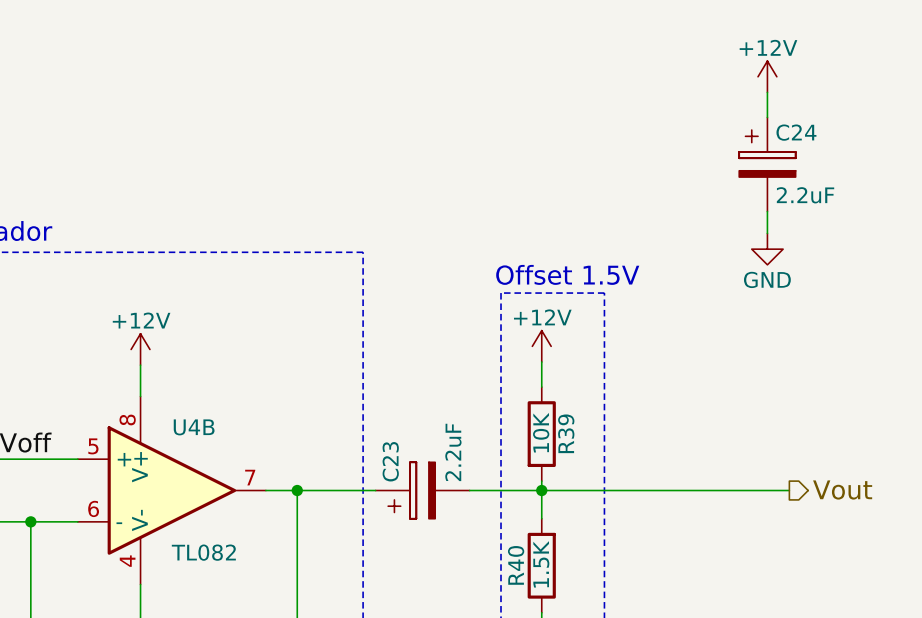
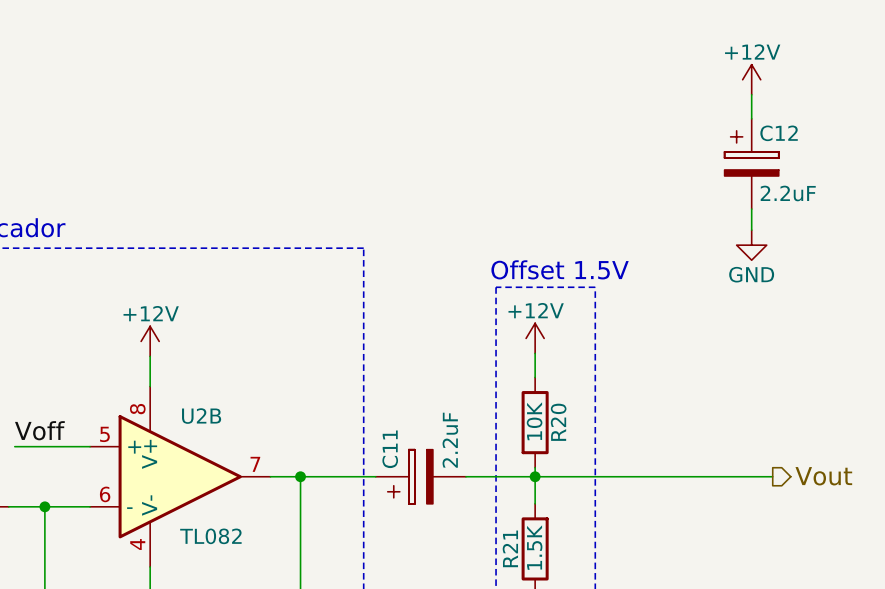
C24 name: C24 (796, 132) -> C12 (779, 133)
U4B name: U4B (194, 427) -> U2B (201, 416)
R39 name: R39 (566, 433) -> R20 (558, 422)
C23 name: C23 (390, 461) -> C11 (390, 449)
R40 name: R40 (516, 565) -> R21 (510, 548)

